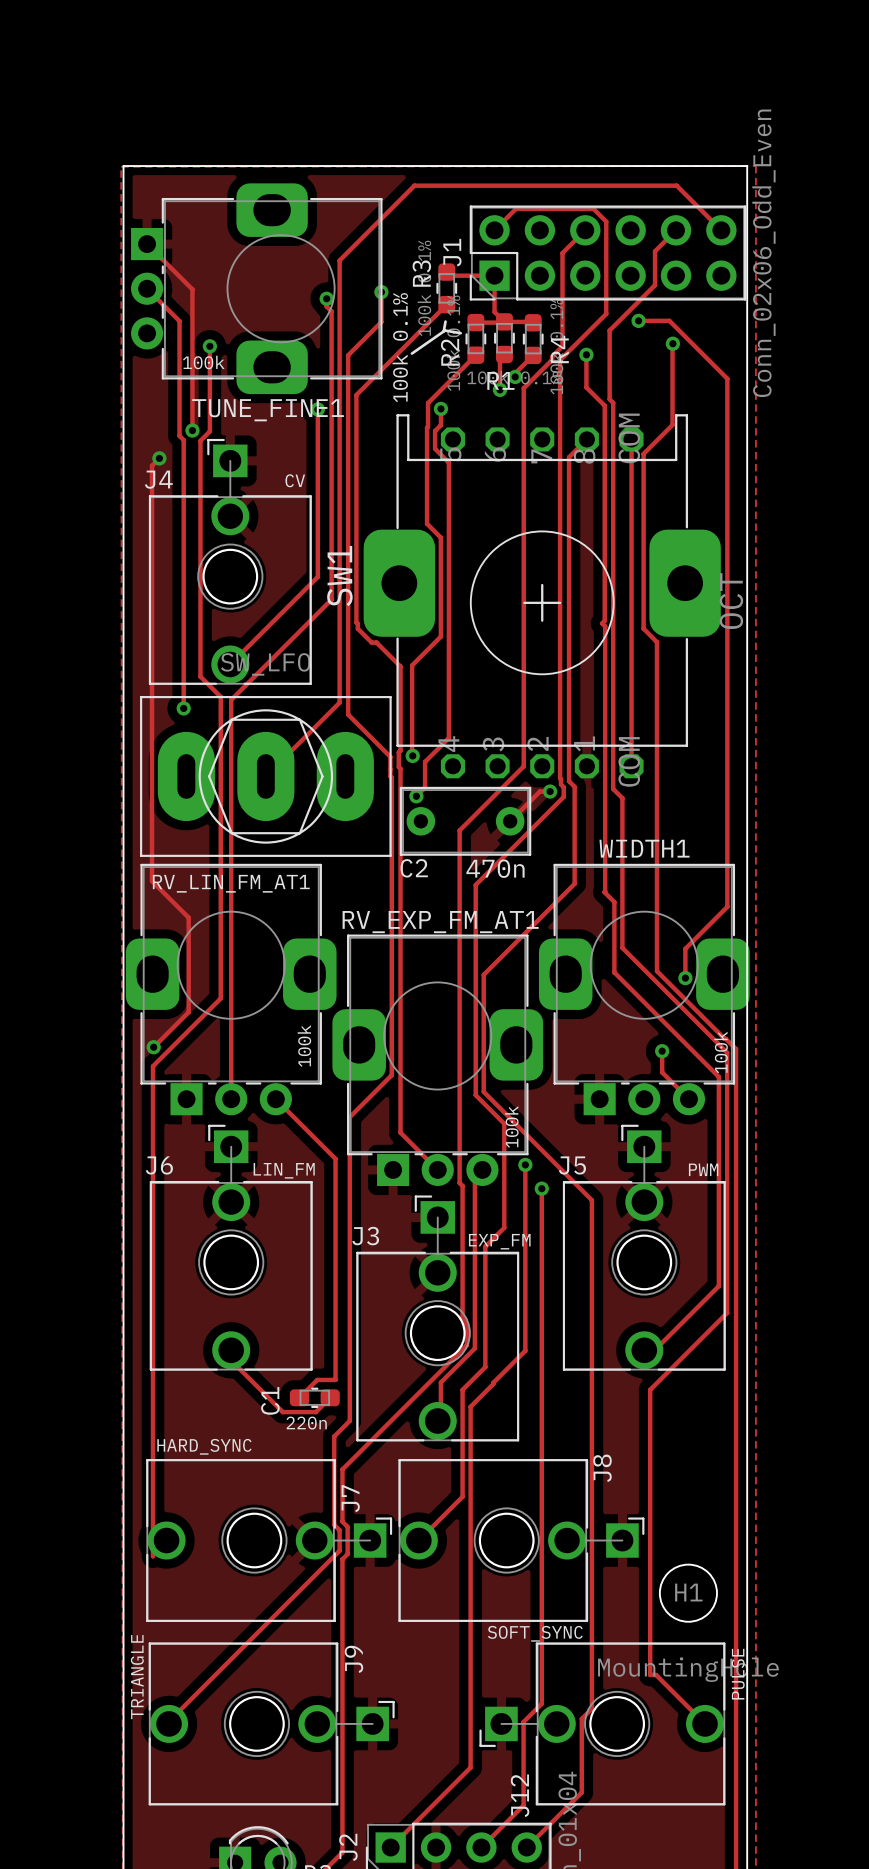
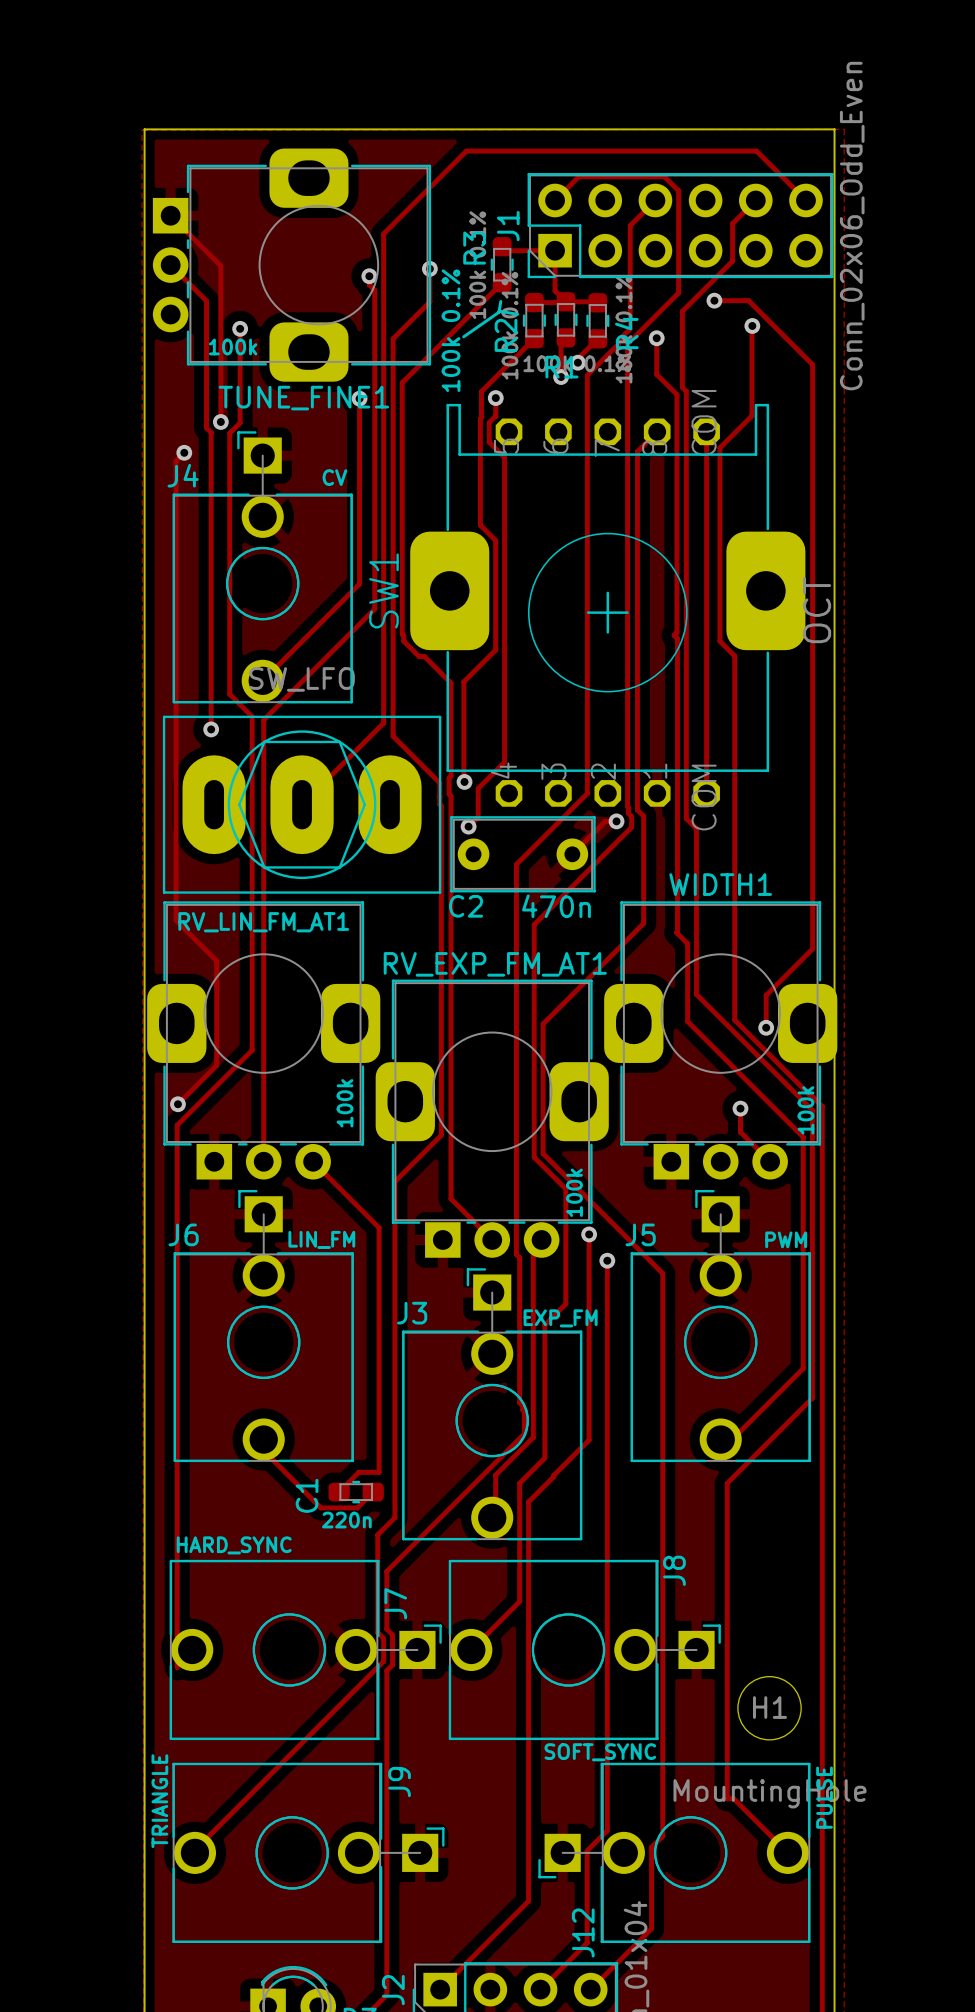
J4 footprint: [148, 438, 312, 685] -> [172, 431, 353, 704]
J6 footprint: [149, 1124, 313, 1371] -> [173, 1189, 354, 1463]
J5 footprint: [562, 1124, 726, 1371] -> [630, 1189, 811, 1463]
J3 footprint: [356, 1195, 520, 1442] -> [402, 1268, 583, 1541]
J7 footprint: [146, 1459, 393, 1622] -> [169, 1559, 442, 1741]
J8 footprint: [398, 1459, 645, 1622] -> [448, 1559, 721, 1741]
J9 footprint: [148, 1642, 395, 1806] -> [172, 1762, 445, 1943]
J12 footprint: [479, 1642, 726, 1806] -> [538, 1762, 811, 1943]

